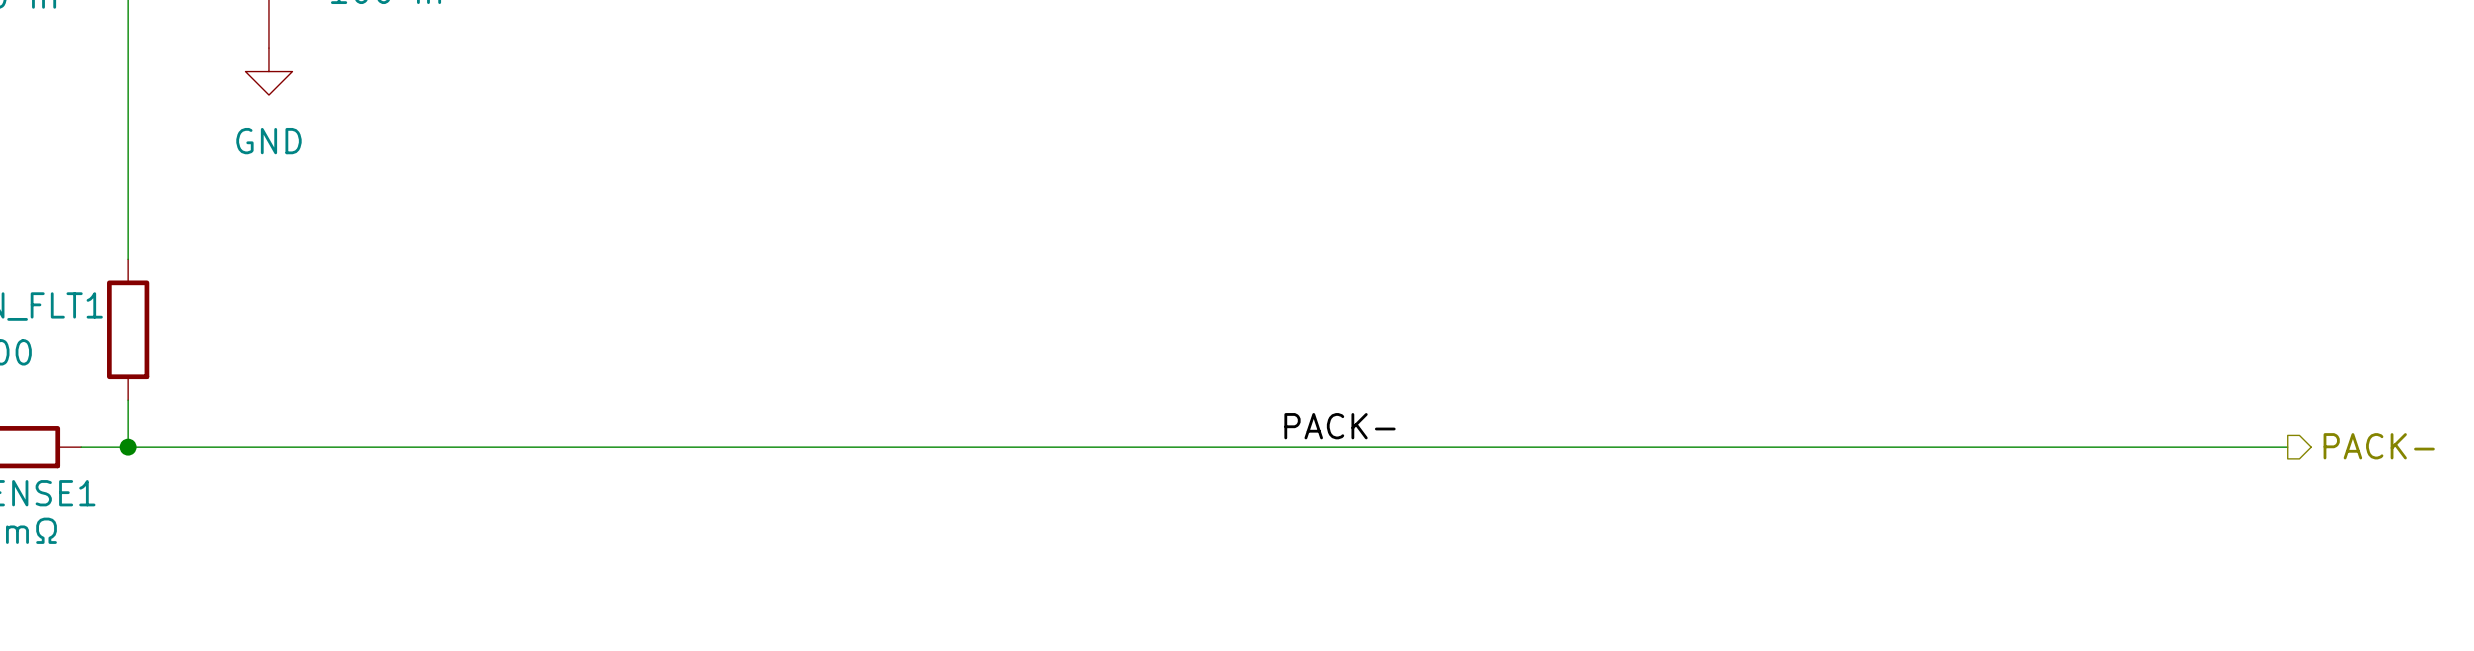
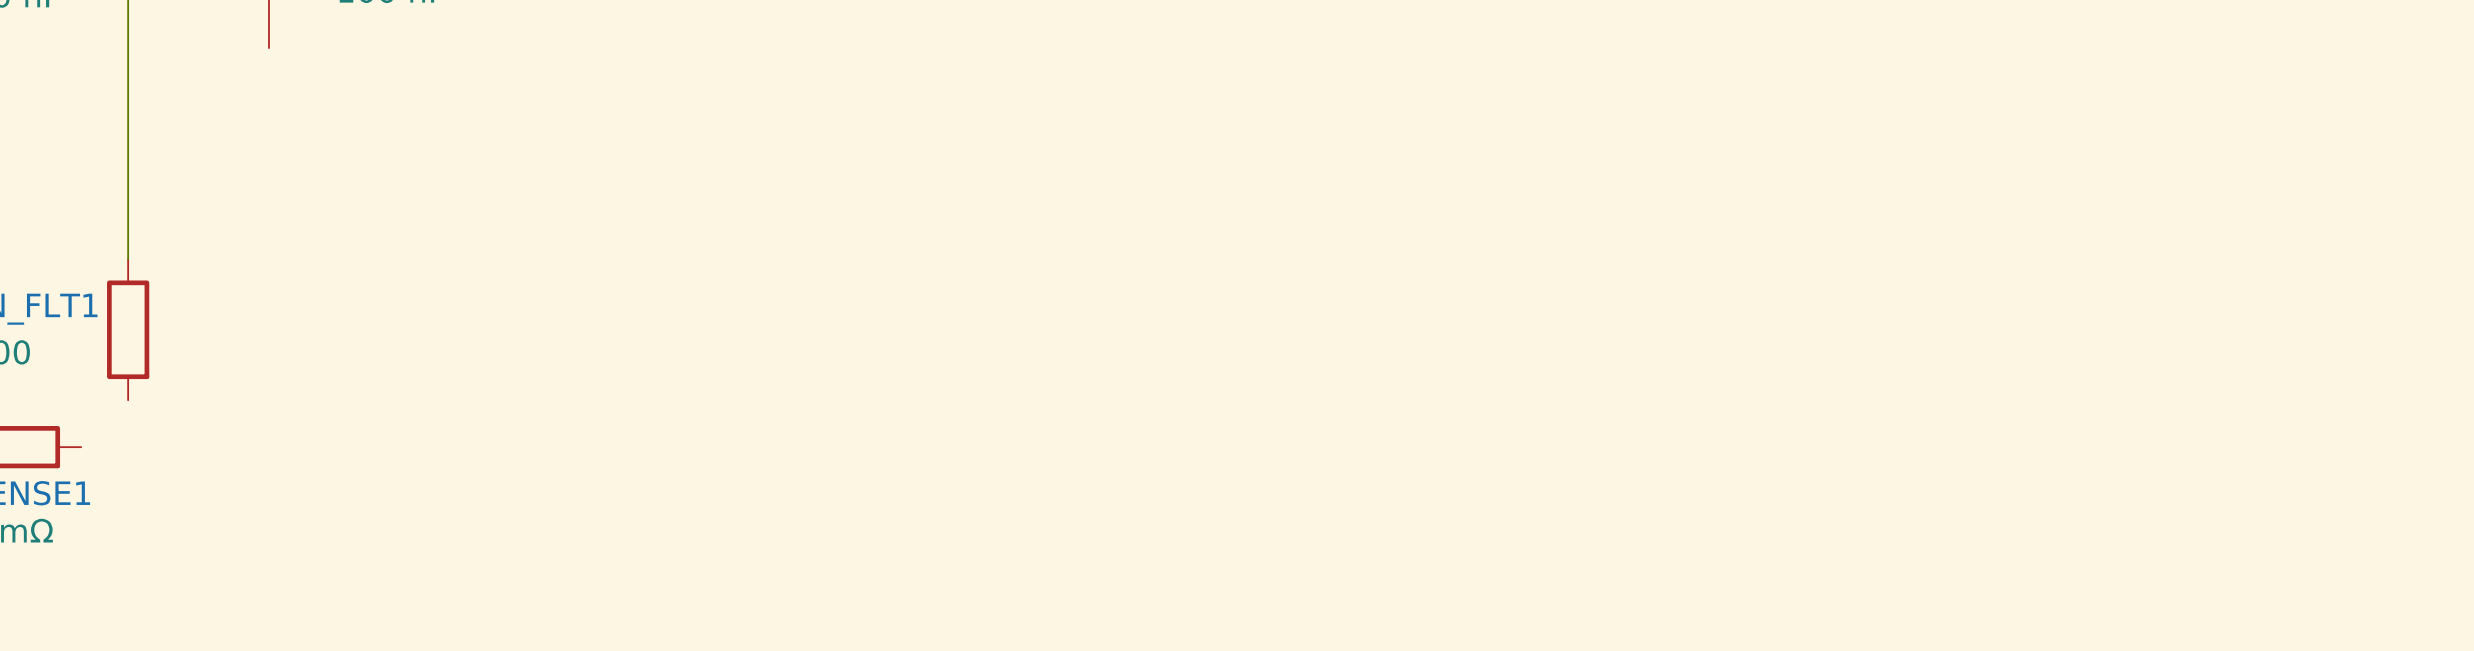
power symbol: GND (268, 71) -> none
wire: (128, 400) (128, 447) -> none
label: PACK- (1340, 426) -> none
hierarchical label: PACK- (2379, 446) -> none
wire: (81, 447) (2287, 447) -> none
junction: (128, 447) -> none

